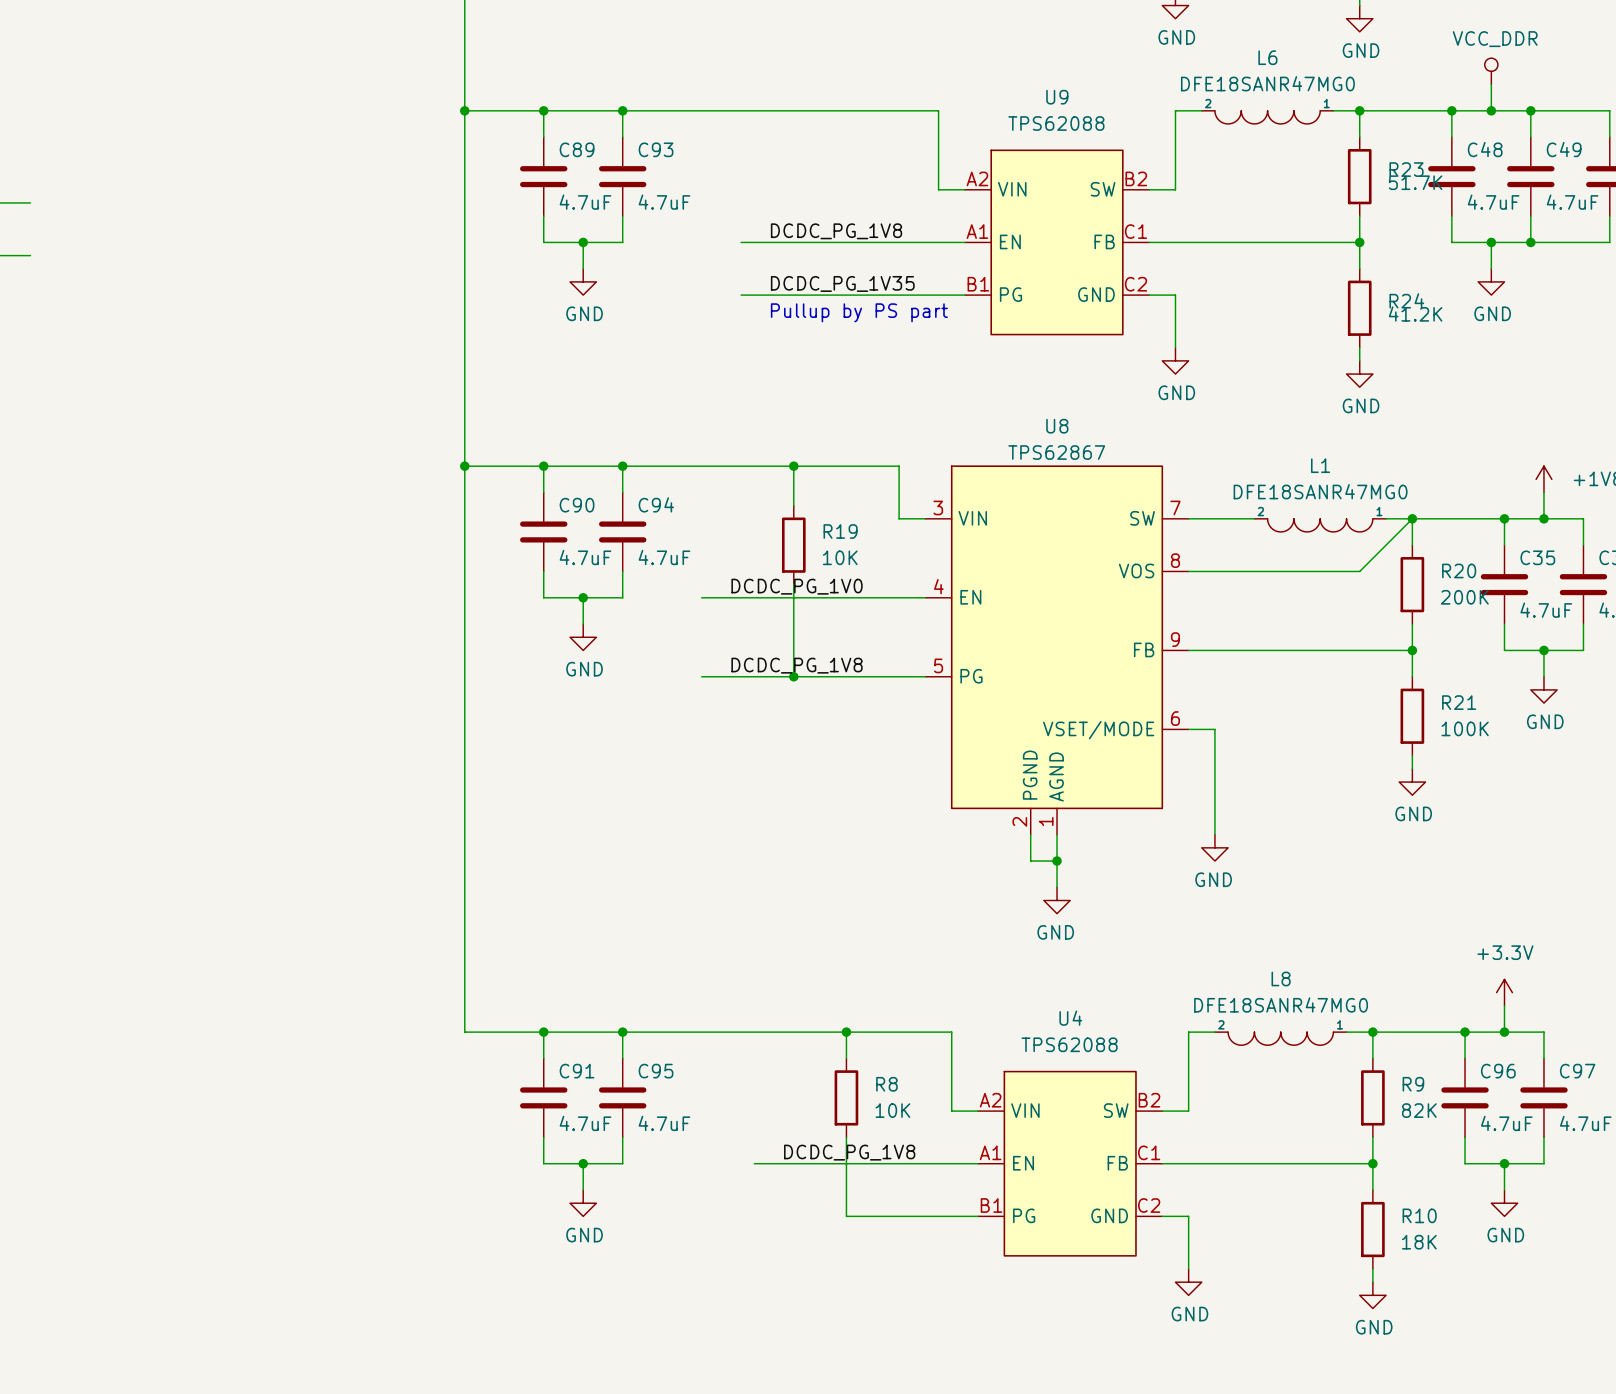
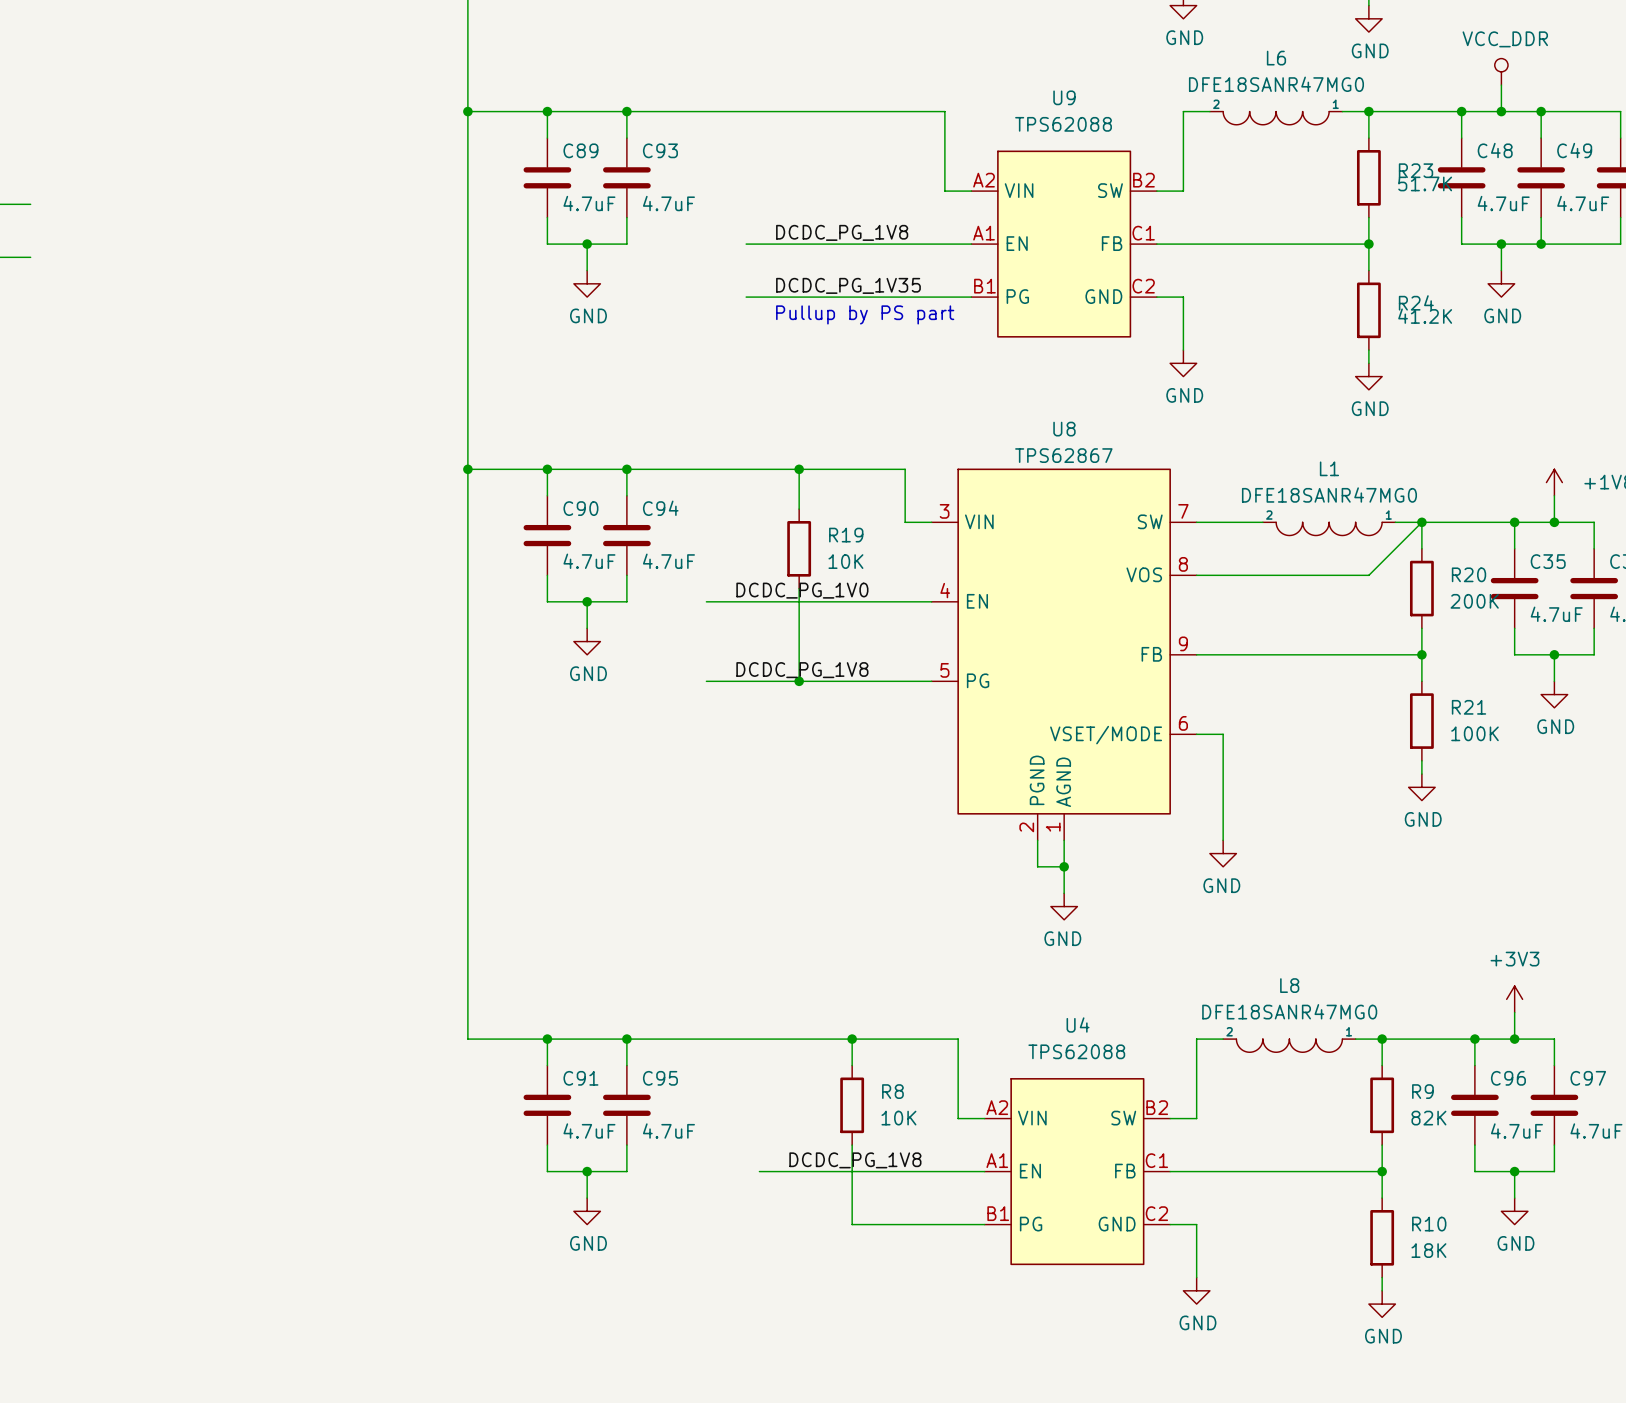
power symbol: +3.3V (1504, 992) -> +3V3 (1514, 999)

